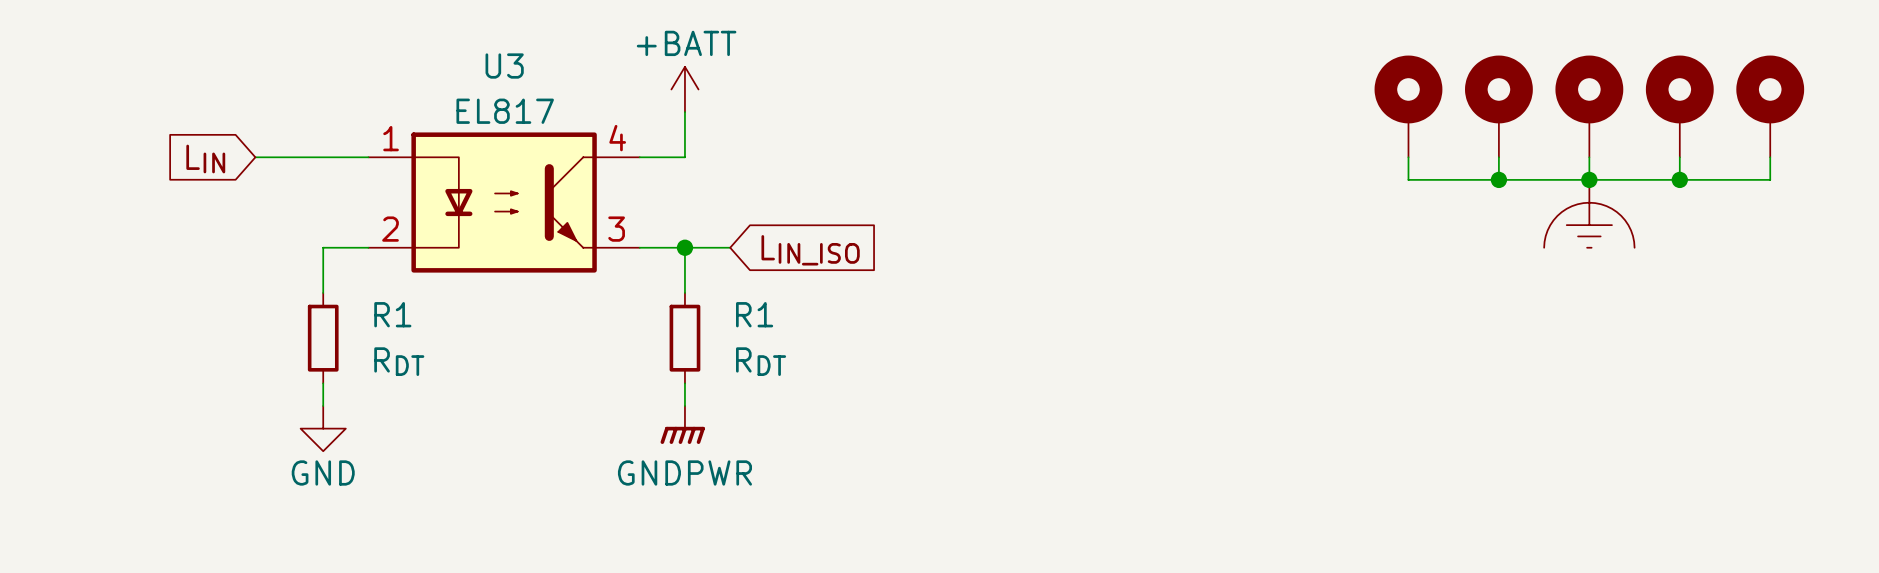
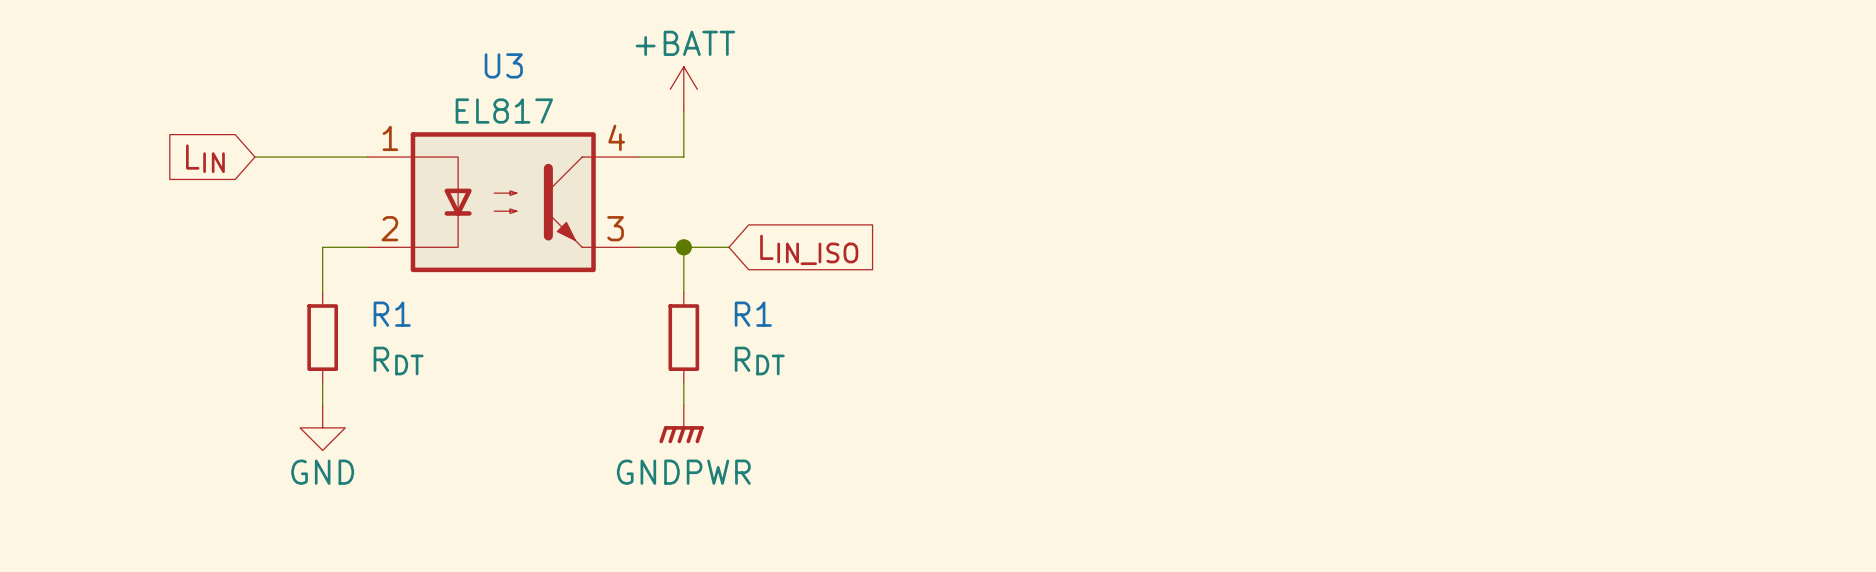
part: (1408, 106) -> none
part: (1498, 106) -> none
part: (1589, 106) -> none
part: (1679, 106) -> none
part: (1770, 106) -> none
wire: (1408, 157) (1408, 179) (1770, 179) (1770, 157) -> none
wire: (1498, 157) (1498, 179) -> none
wire: (1589, 157) (1589, 179) -> none
wire: (1679, 157) (1679, 179) -> none
junction: (1498, 179) -> none
junction: (1589, 179) -> none
junction: (1679, 179) -> none
power symbol: (1589, 213) -> none

